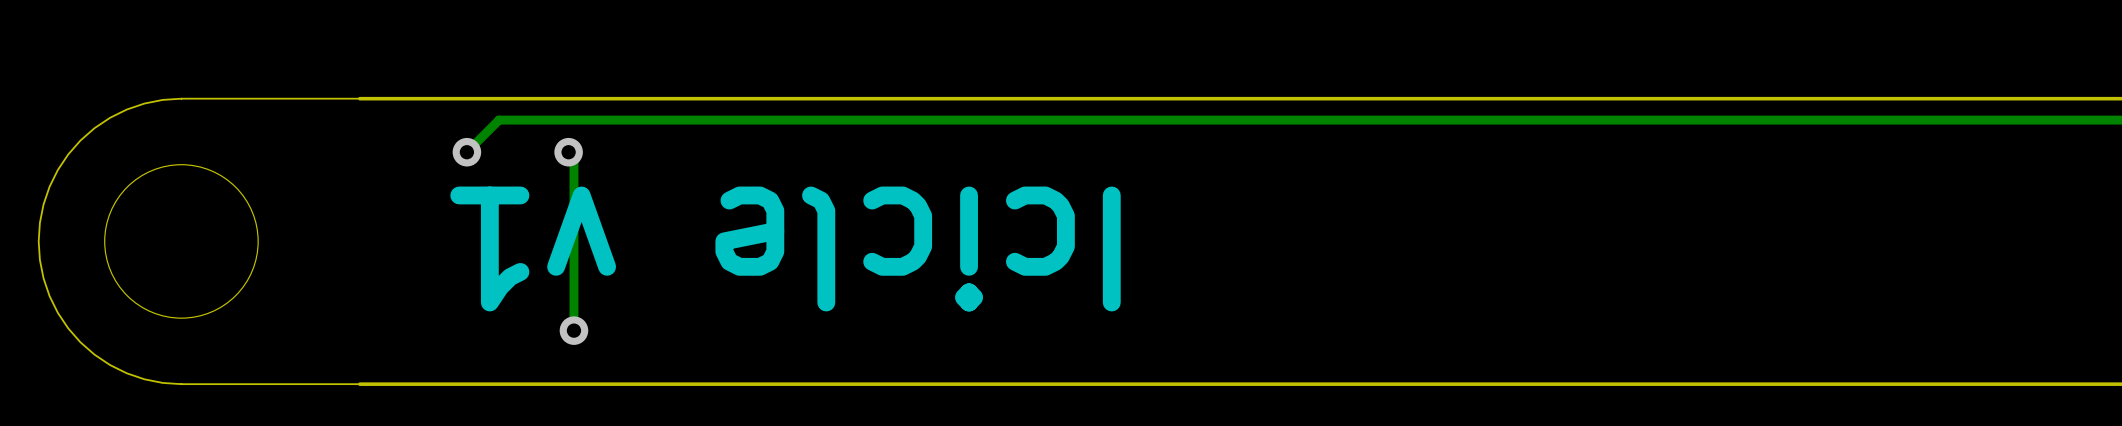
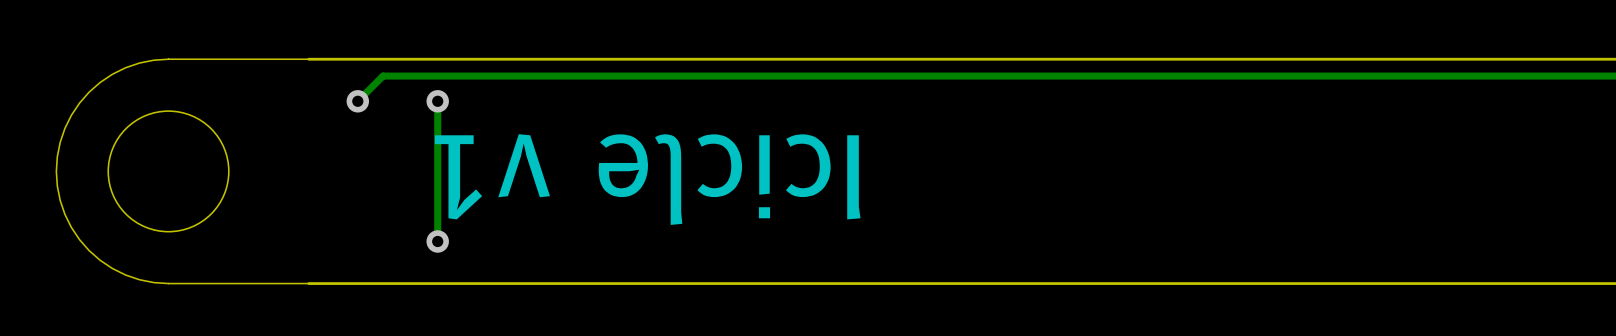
track: (499, 120) (466, 152) -> (418, 76) (383, 76) (357, 101)
via: none -> (357, 101)
via: (466, 152) -> none
track: none -> (437, 101) (437, 241)
via: none -> (437, 101)
track: (568, 152) (573, 152) (573, 330) -> none
via: (568, 152) -> none
via position: (573, 330) -> (437, 241)

